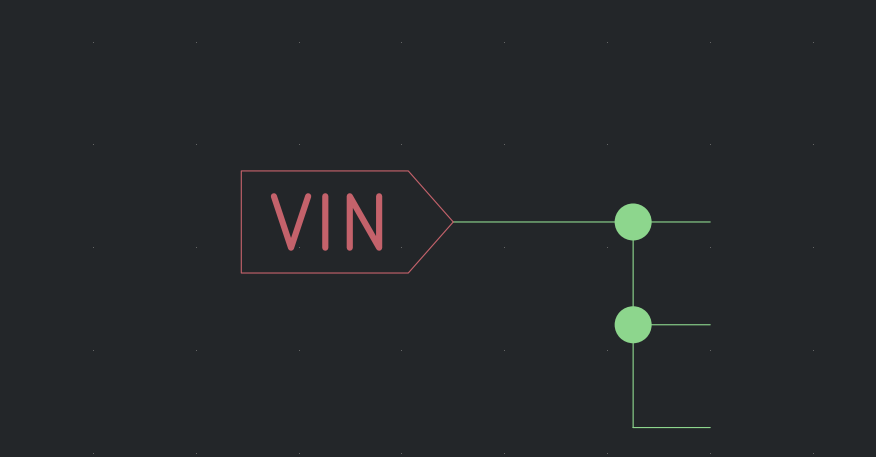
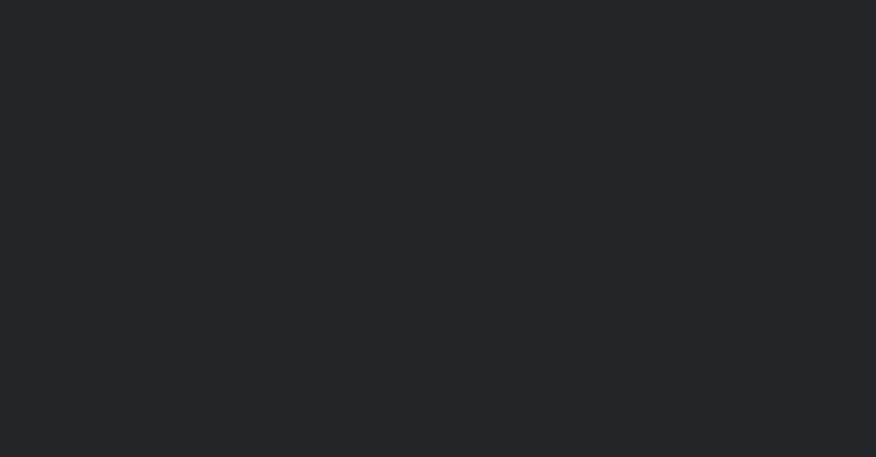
global label: VIN (326, 221) -> none
wire: (453, 221) (710, 221) -> none
wire: (633, 221) (633, 427) (710, 427) -> none
junction: (633, 221) -> none
wire: (633, 324) (710, 324) -> none
junction: (633, 324) -> none

